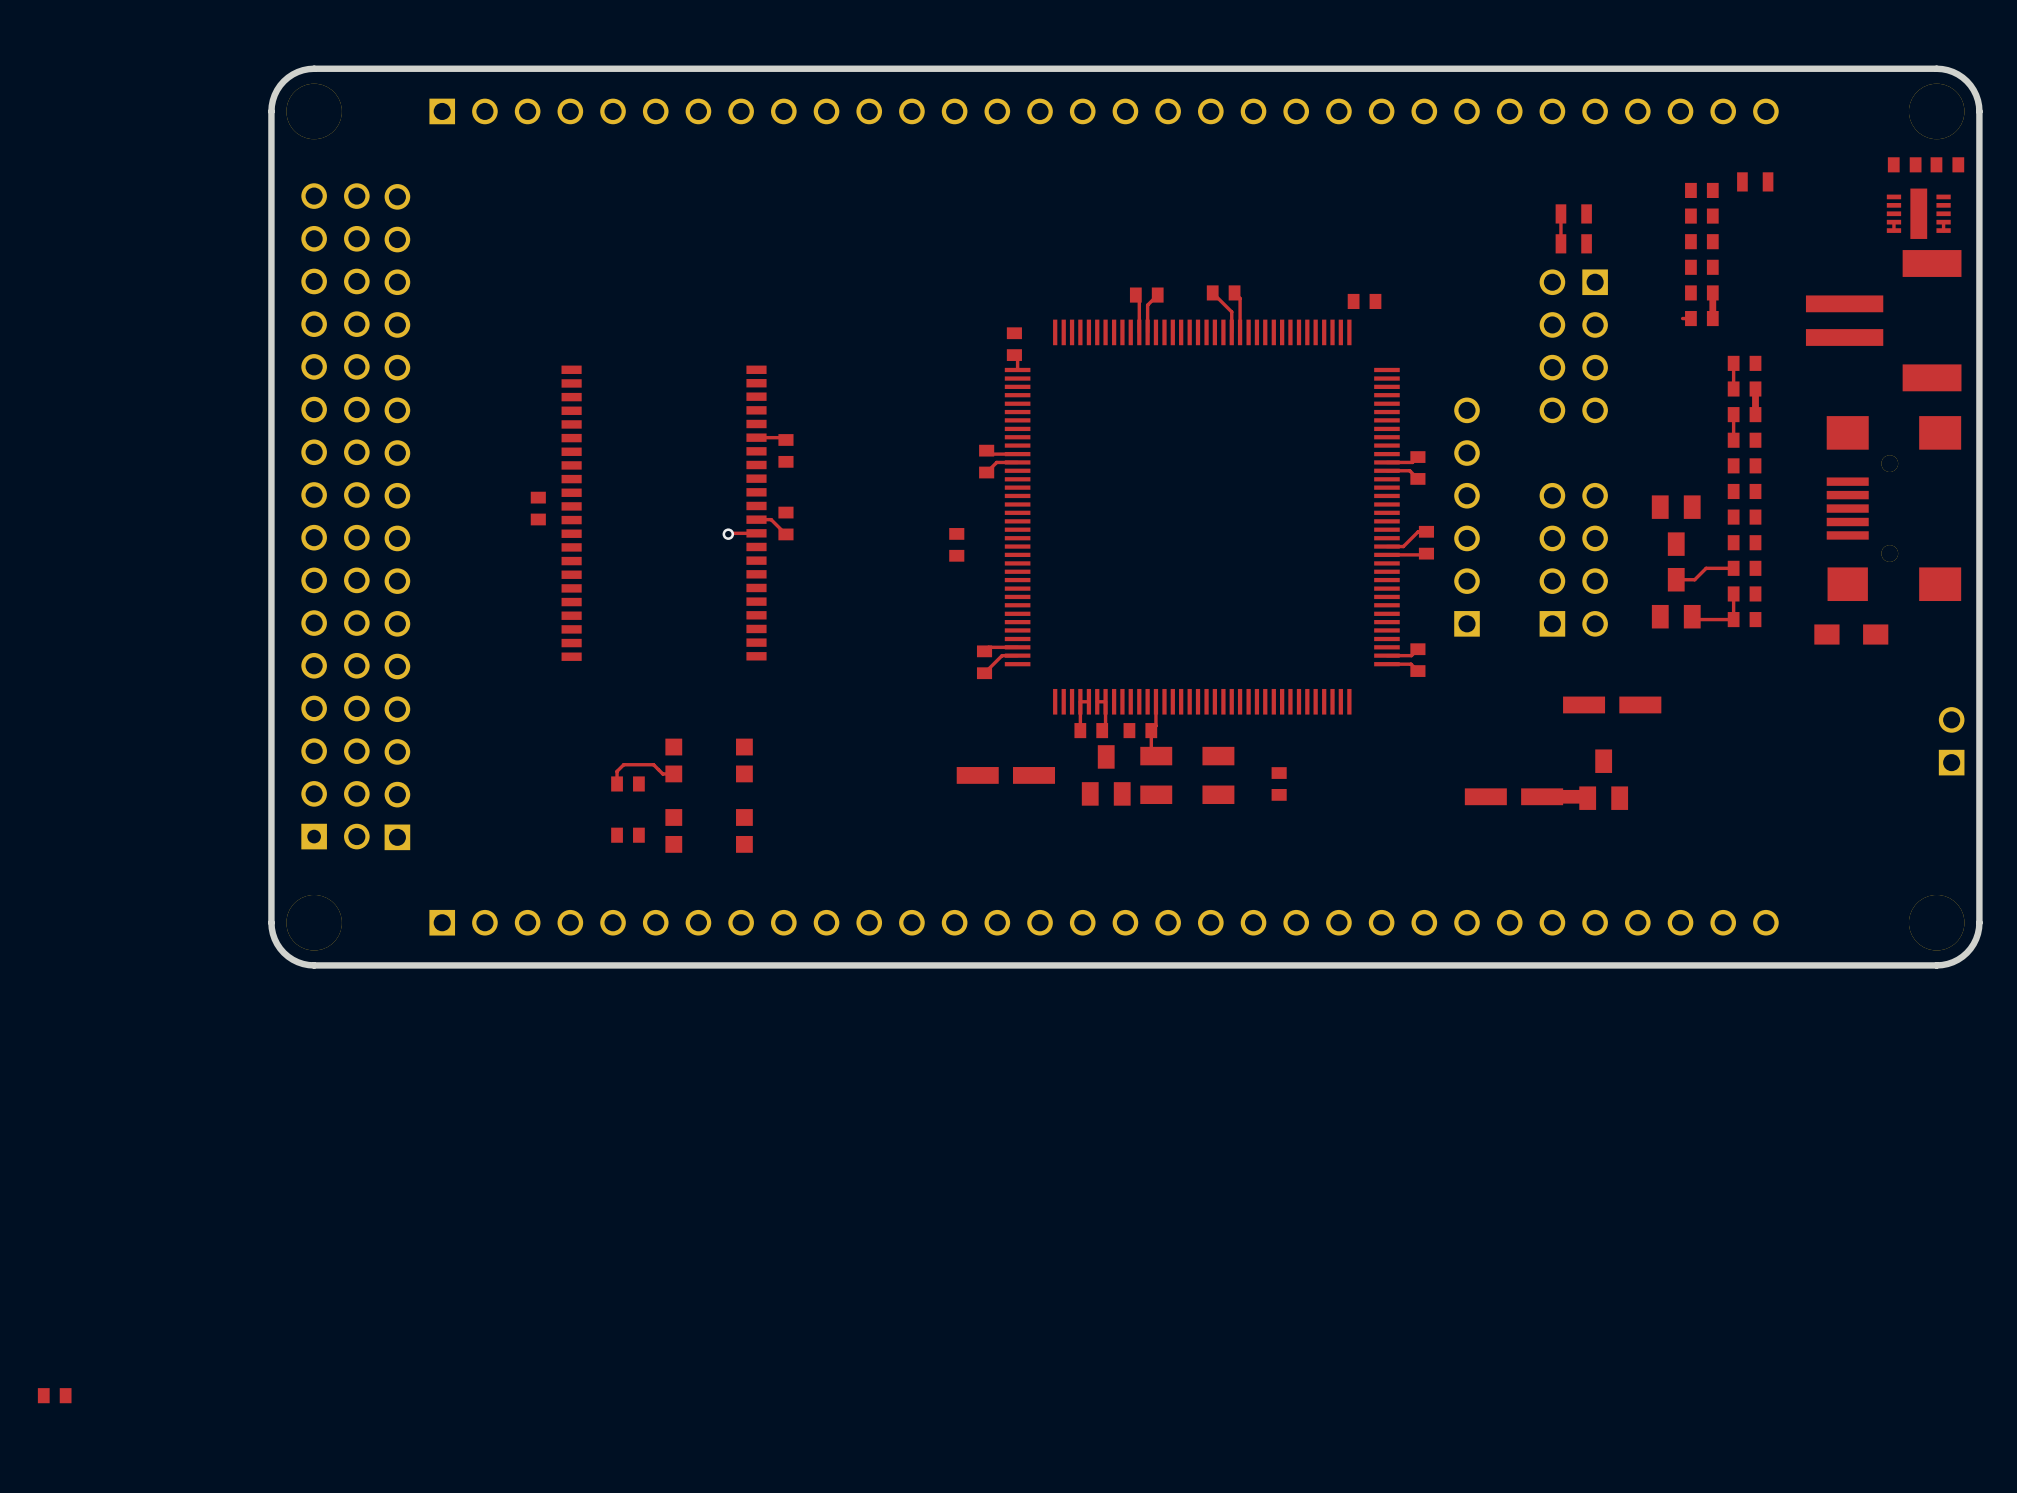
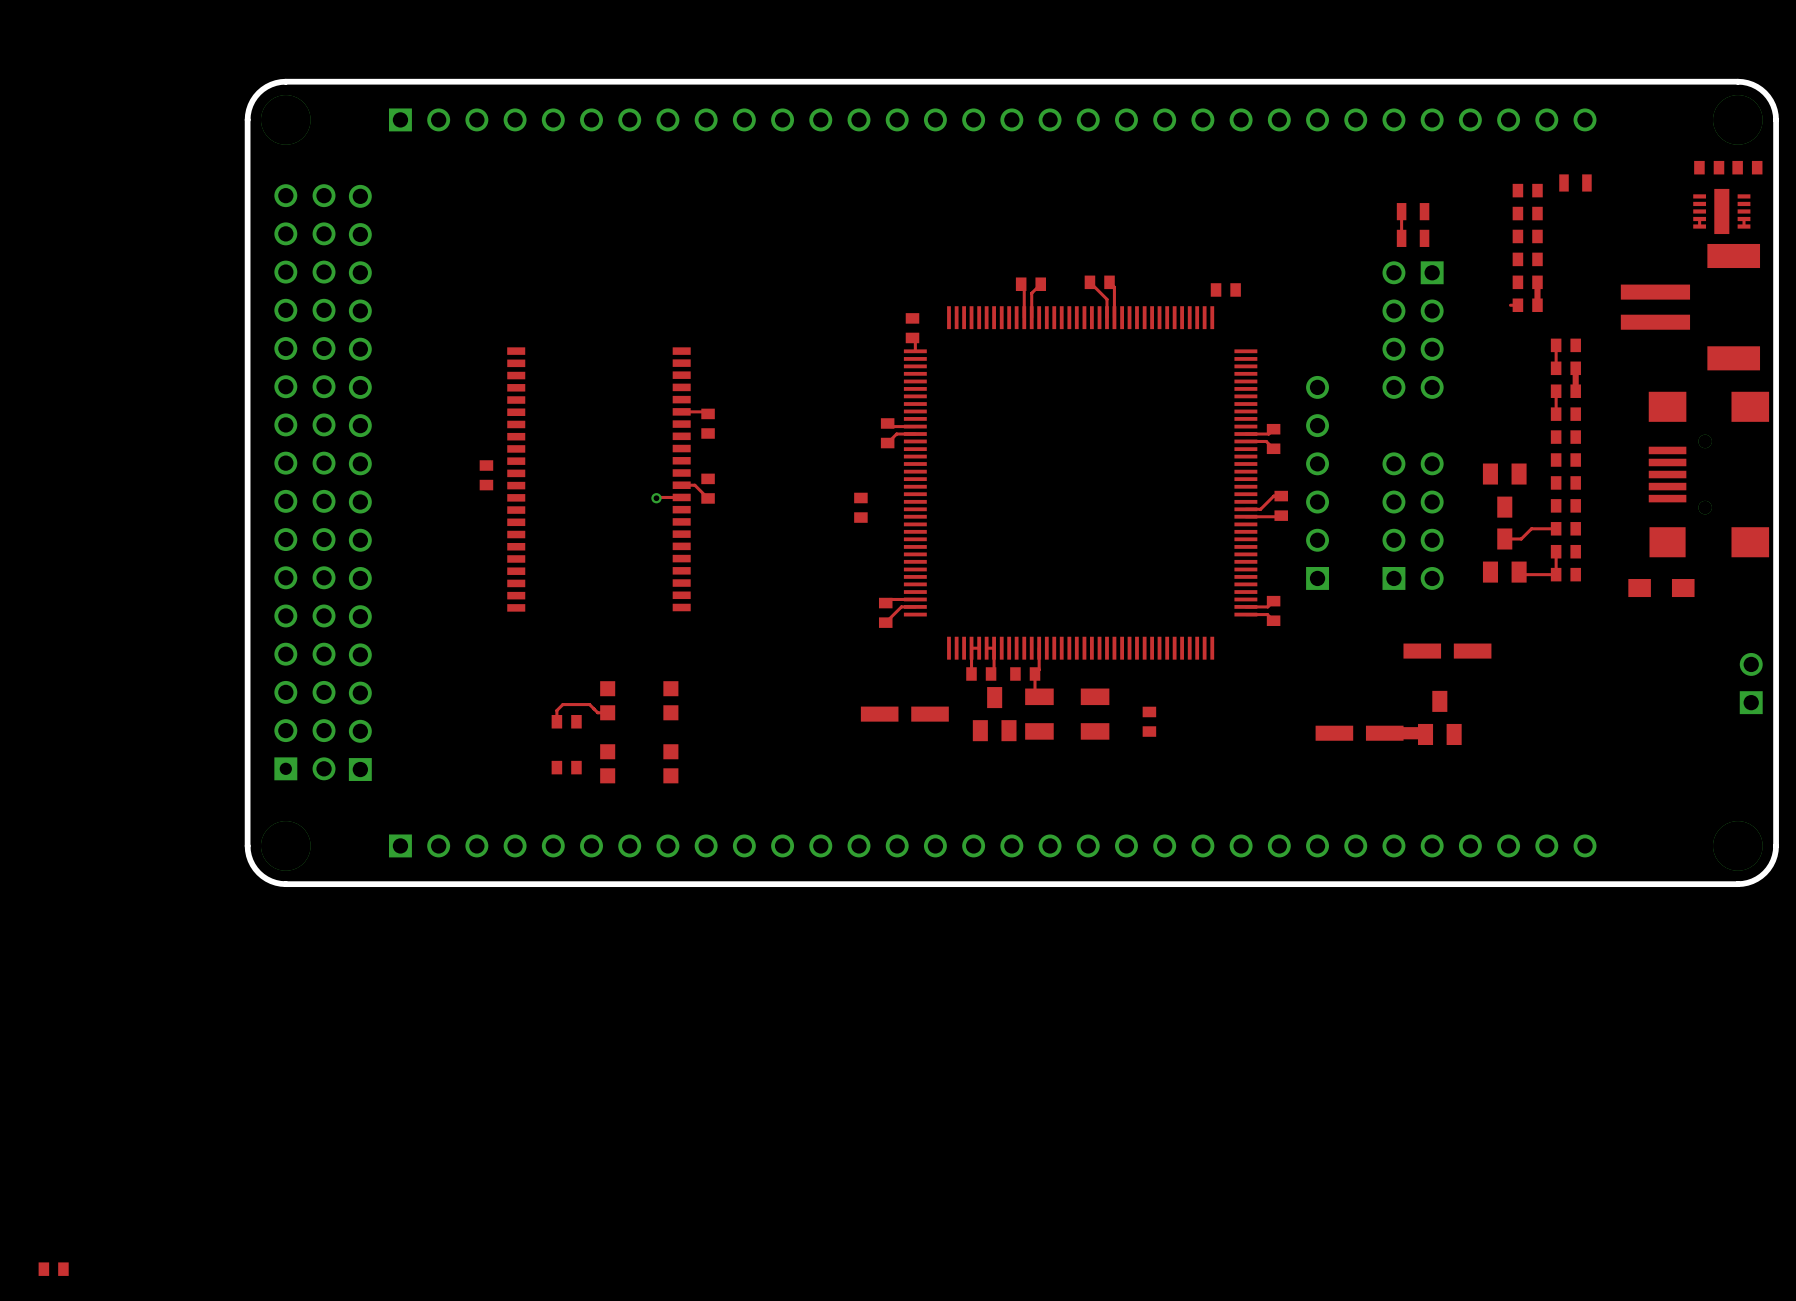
part footprint: [1826, 416, 1962, 602] -> [1648, 391, 1770, 558]

